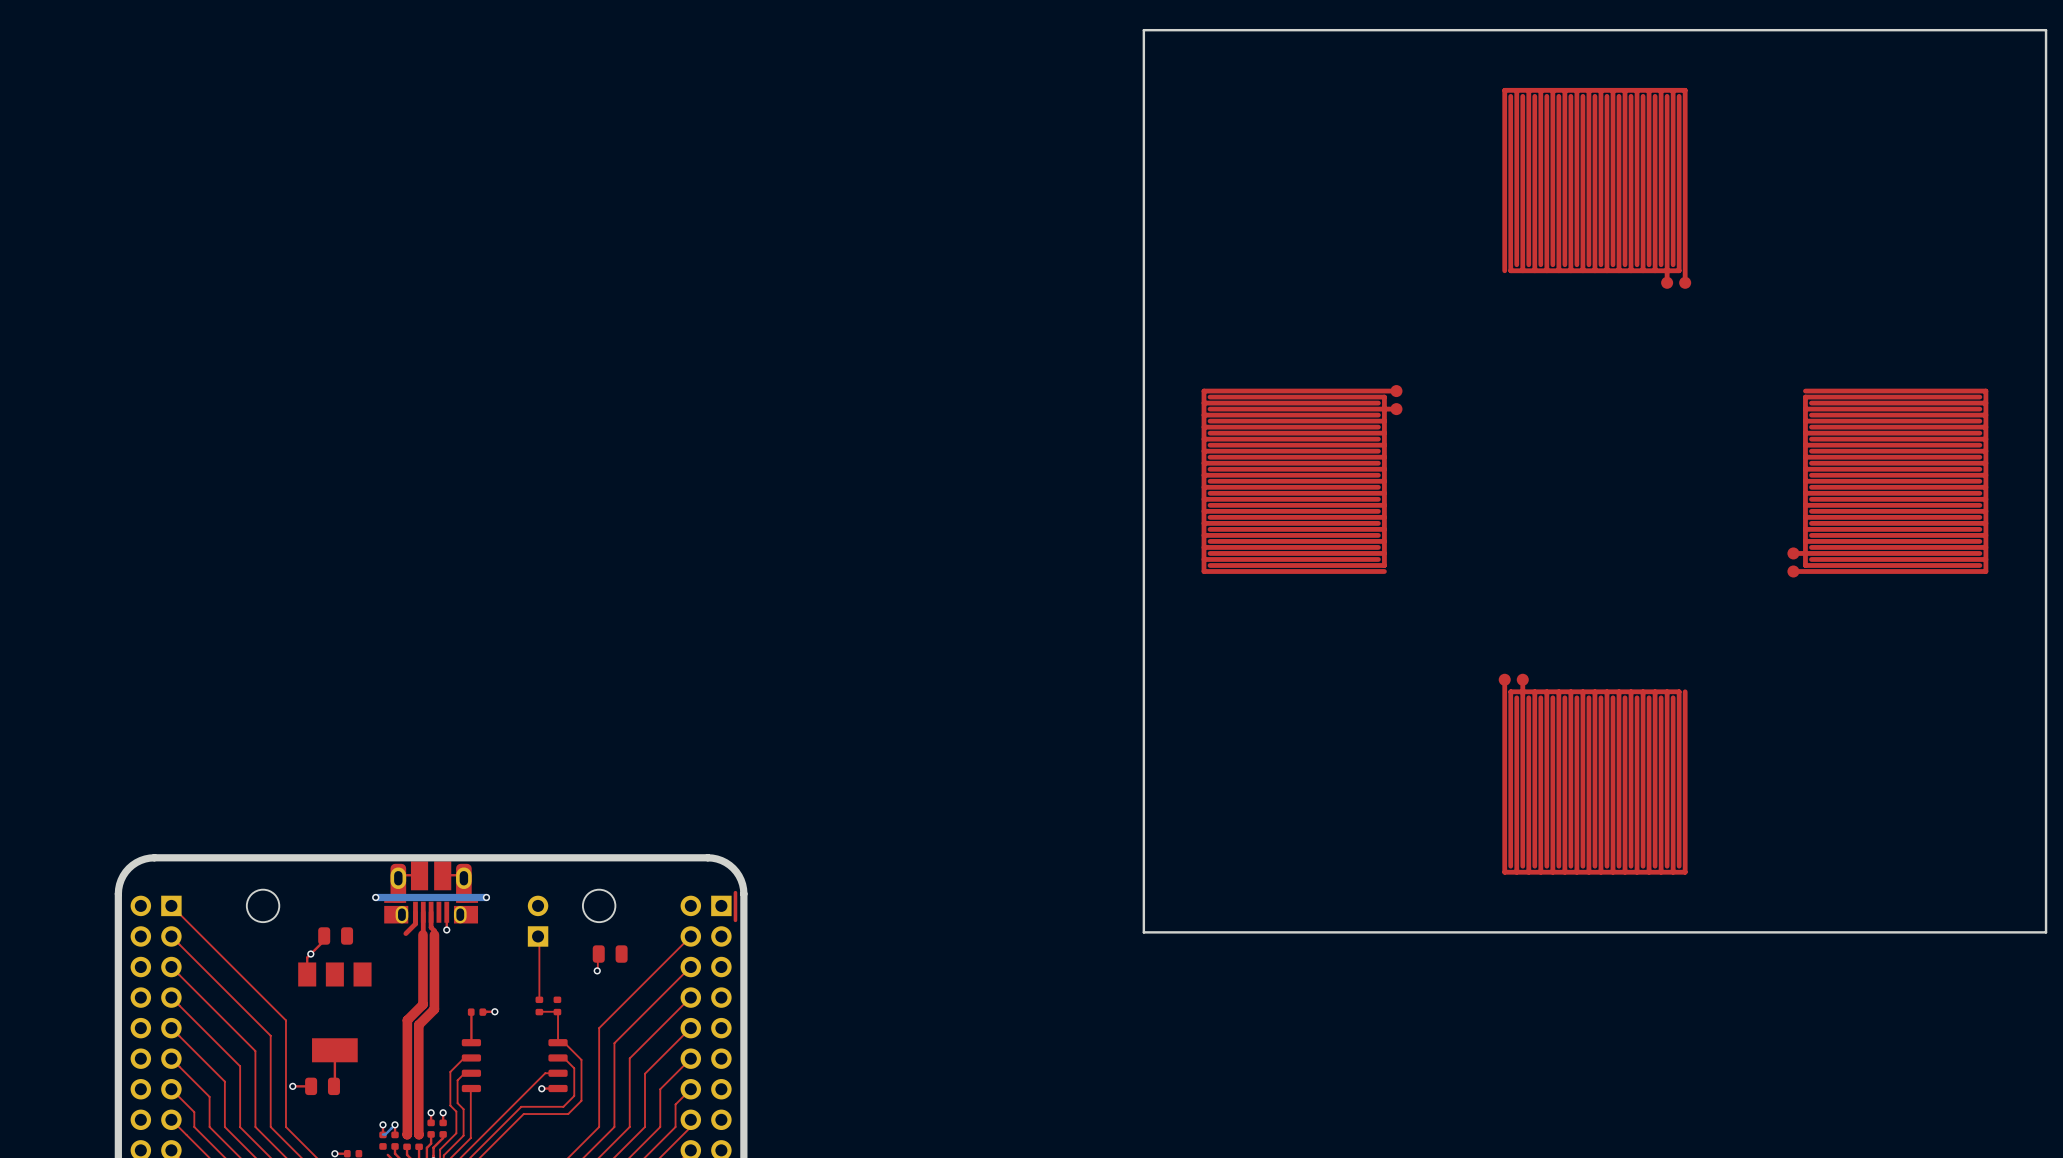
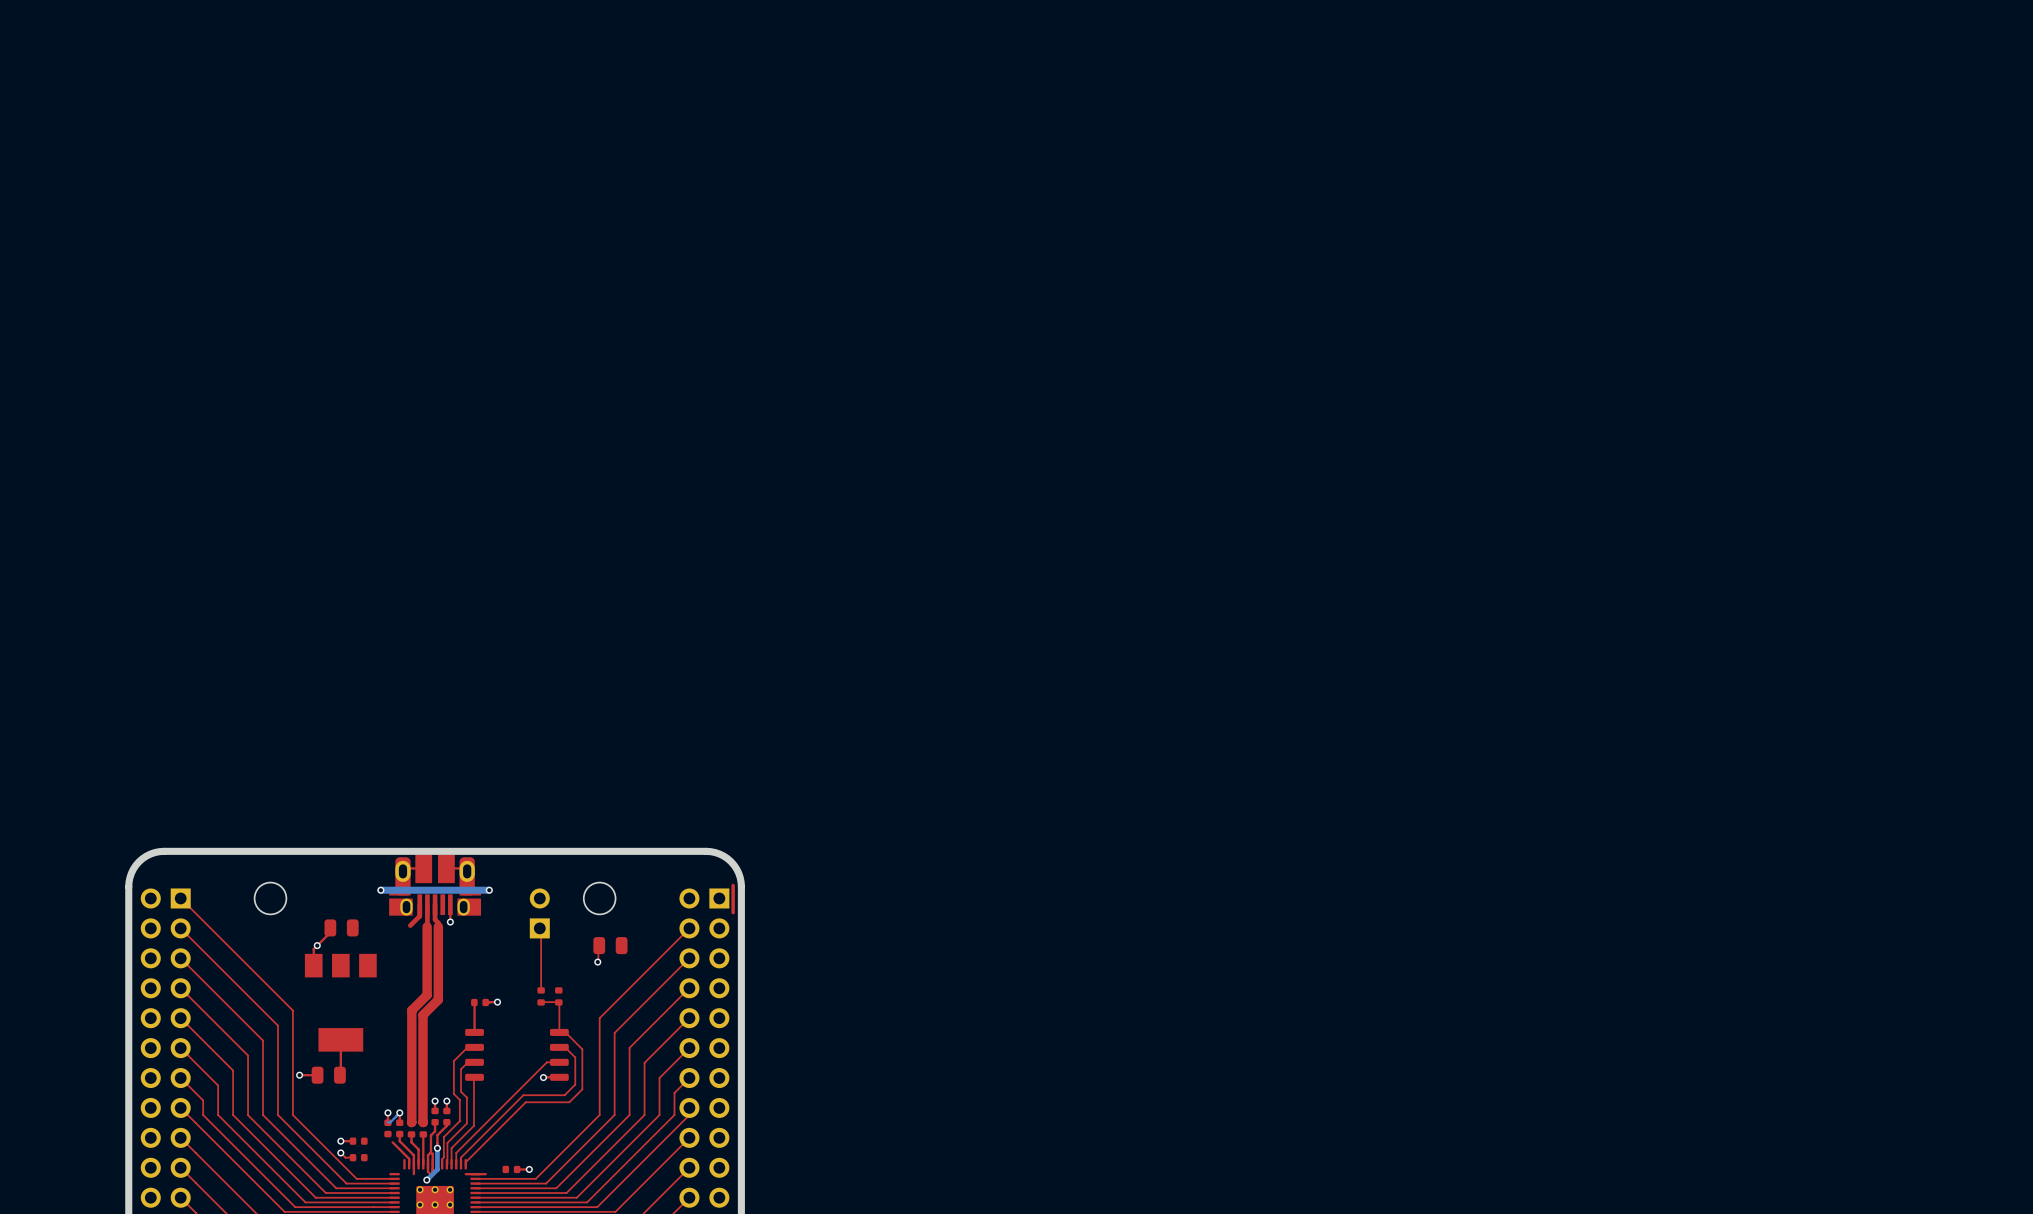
board edge: (2046, 30) (1143, 30) (1143, 932) (2046, 932) (2046, 30) -> none
part: (1596, 188) -> none
part: (1302, 479) -> none
part: (1887, 483) -> none
part: (1593, 774) -> none

